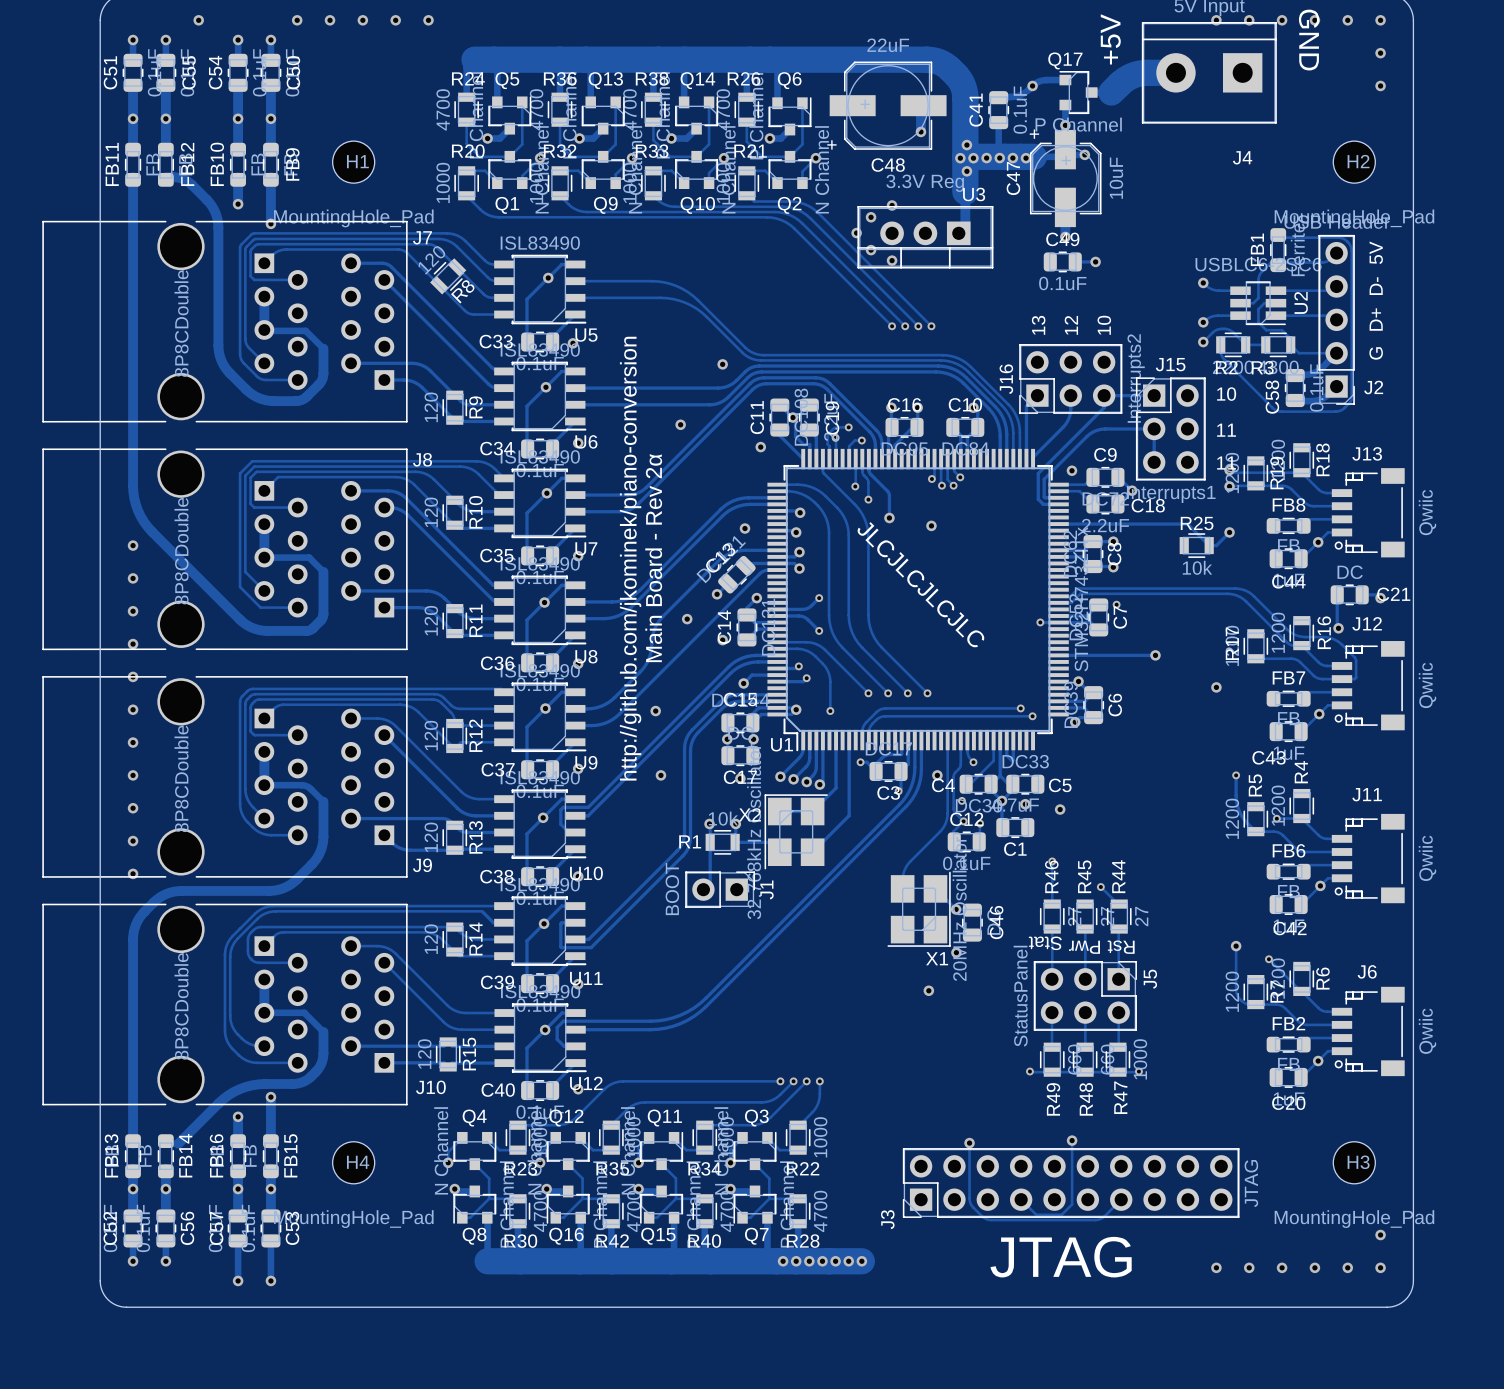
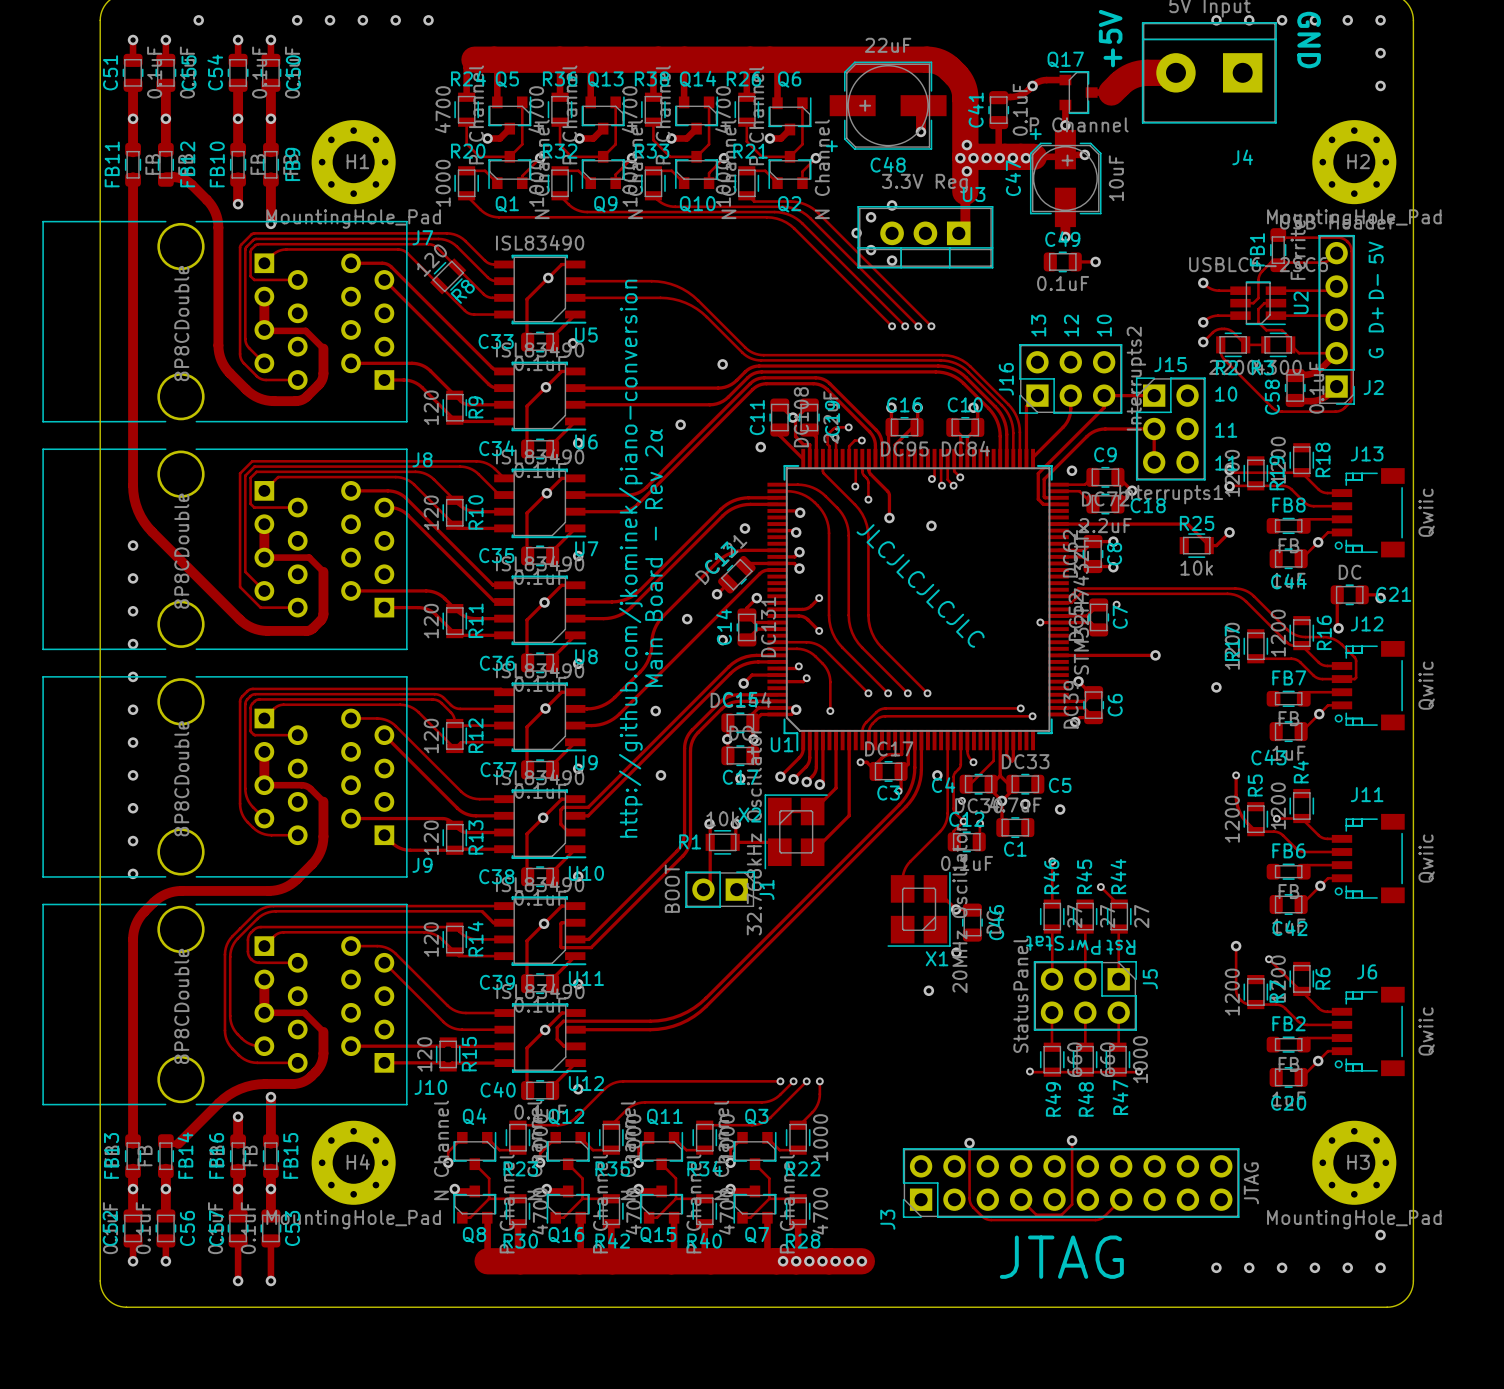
H1 footprint: [332, 141, 375, 184] -> [311, 120, 396, 205]
H2 footprint: [1333, 141, 1376, 184] -> [1312, 120, 1397, 205]
H4 footprint: [332, 1141, 375, 1184] -> [311, 1120, 396, 1205]
H3 footprint: [1333, 1141, 1376, 1184] -> [1312, 1120, 1397, 1205]

